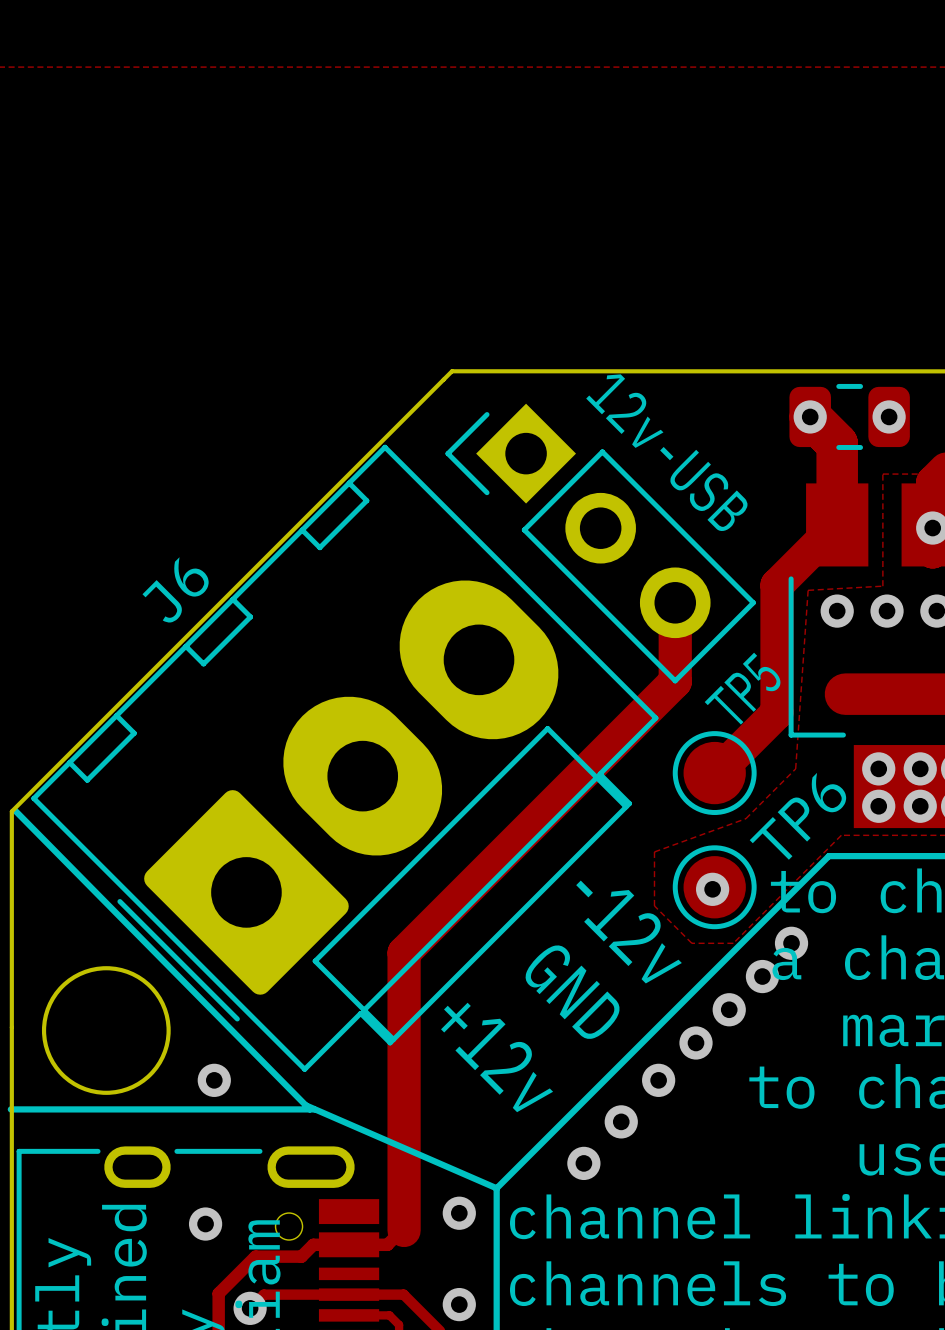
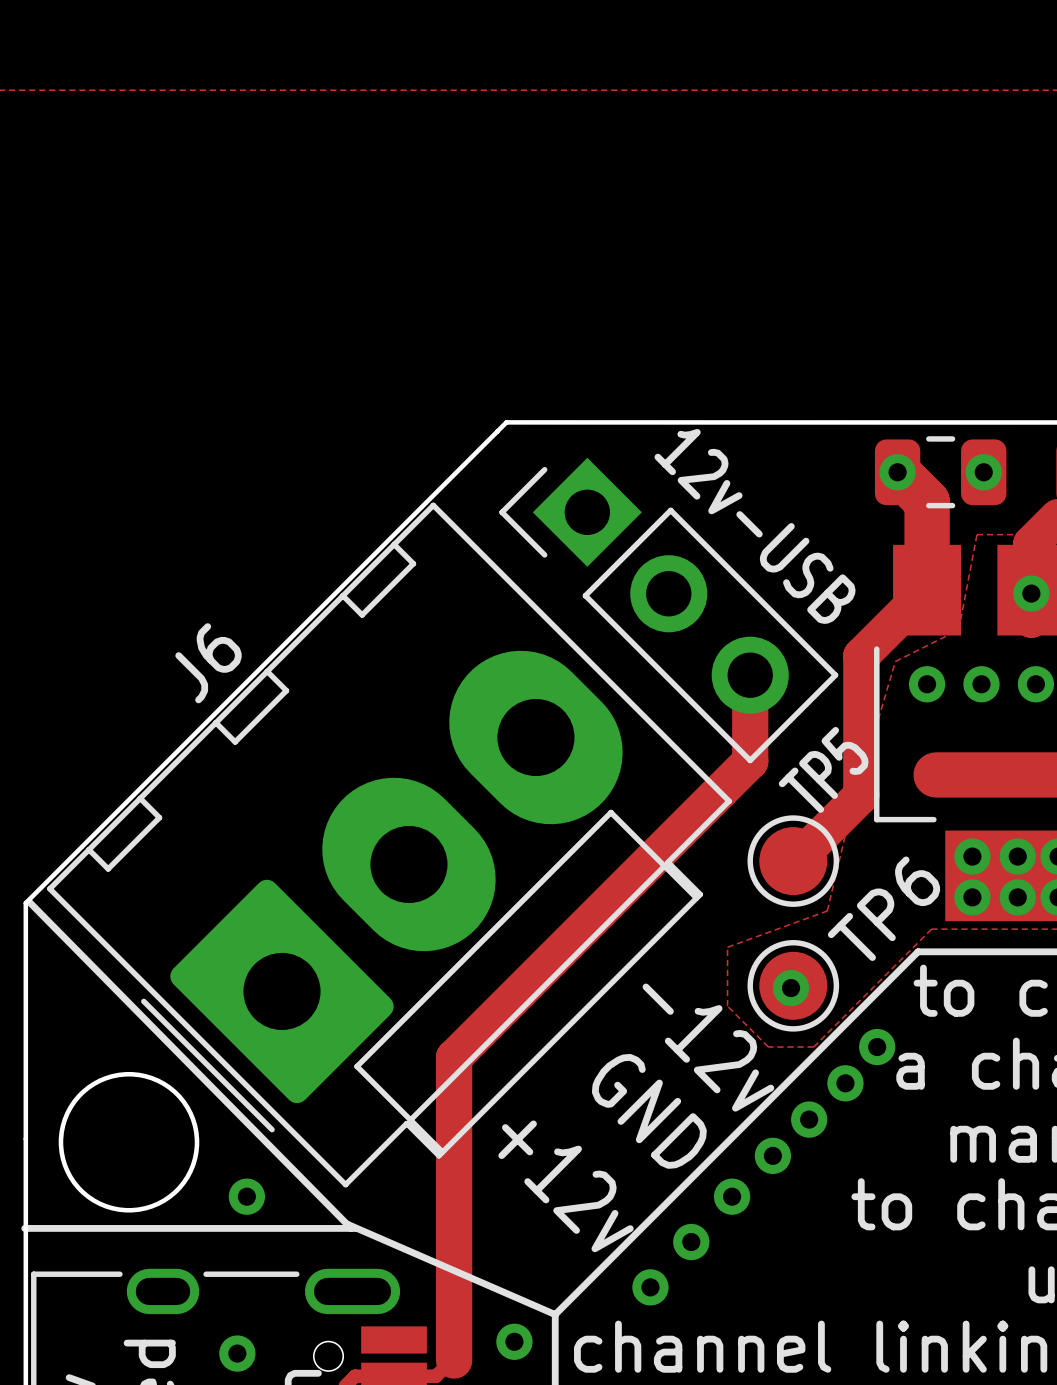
zone outline: (882, 474) (882, 586) (808, 590) (795, 768) (745, 818) -> (976, 534) (958, 629) (895, 661) (849, 815) (827, 911)

